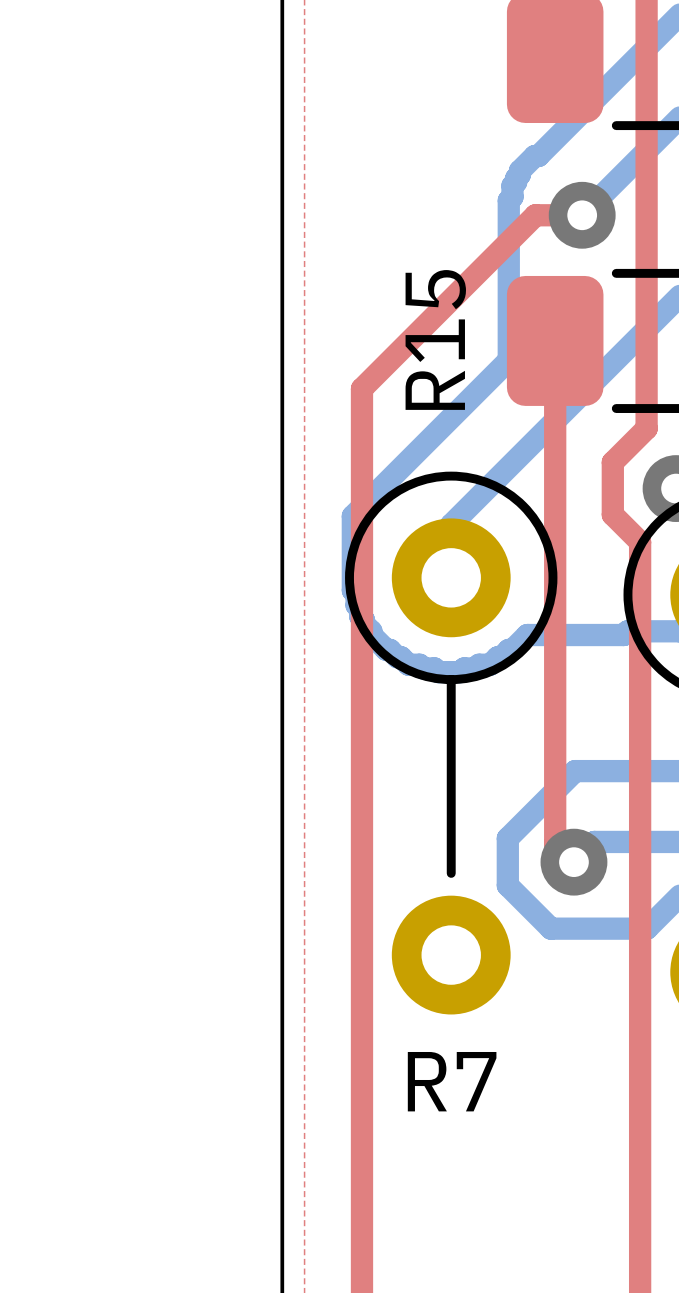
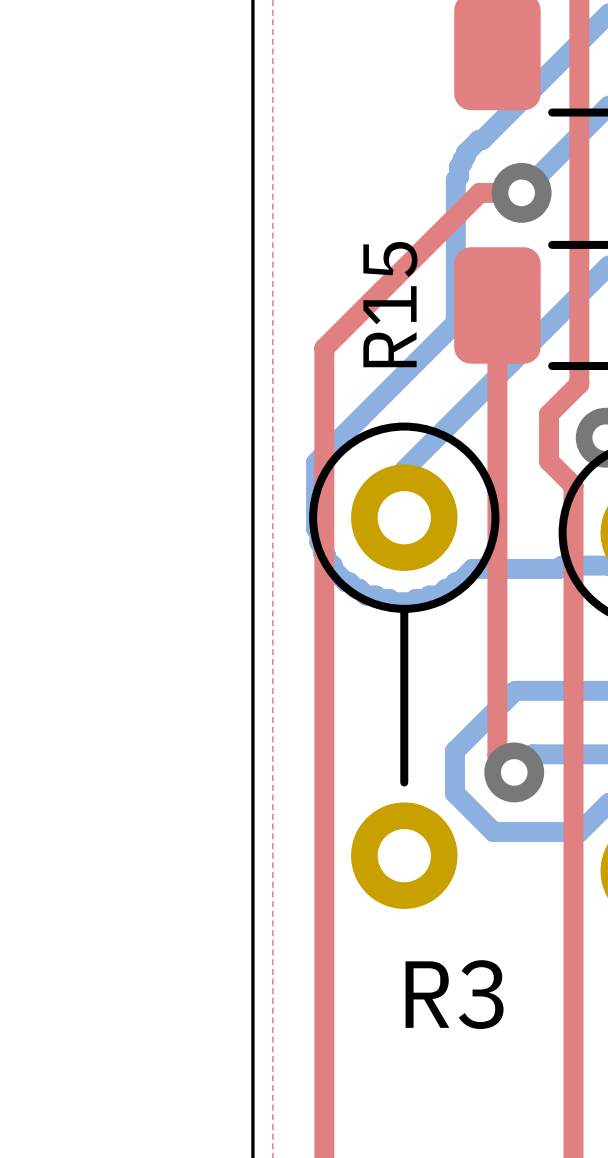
R7 name: R7 (452, 1081) -> none
R3 name: none -> R3 (454, 994)

